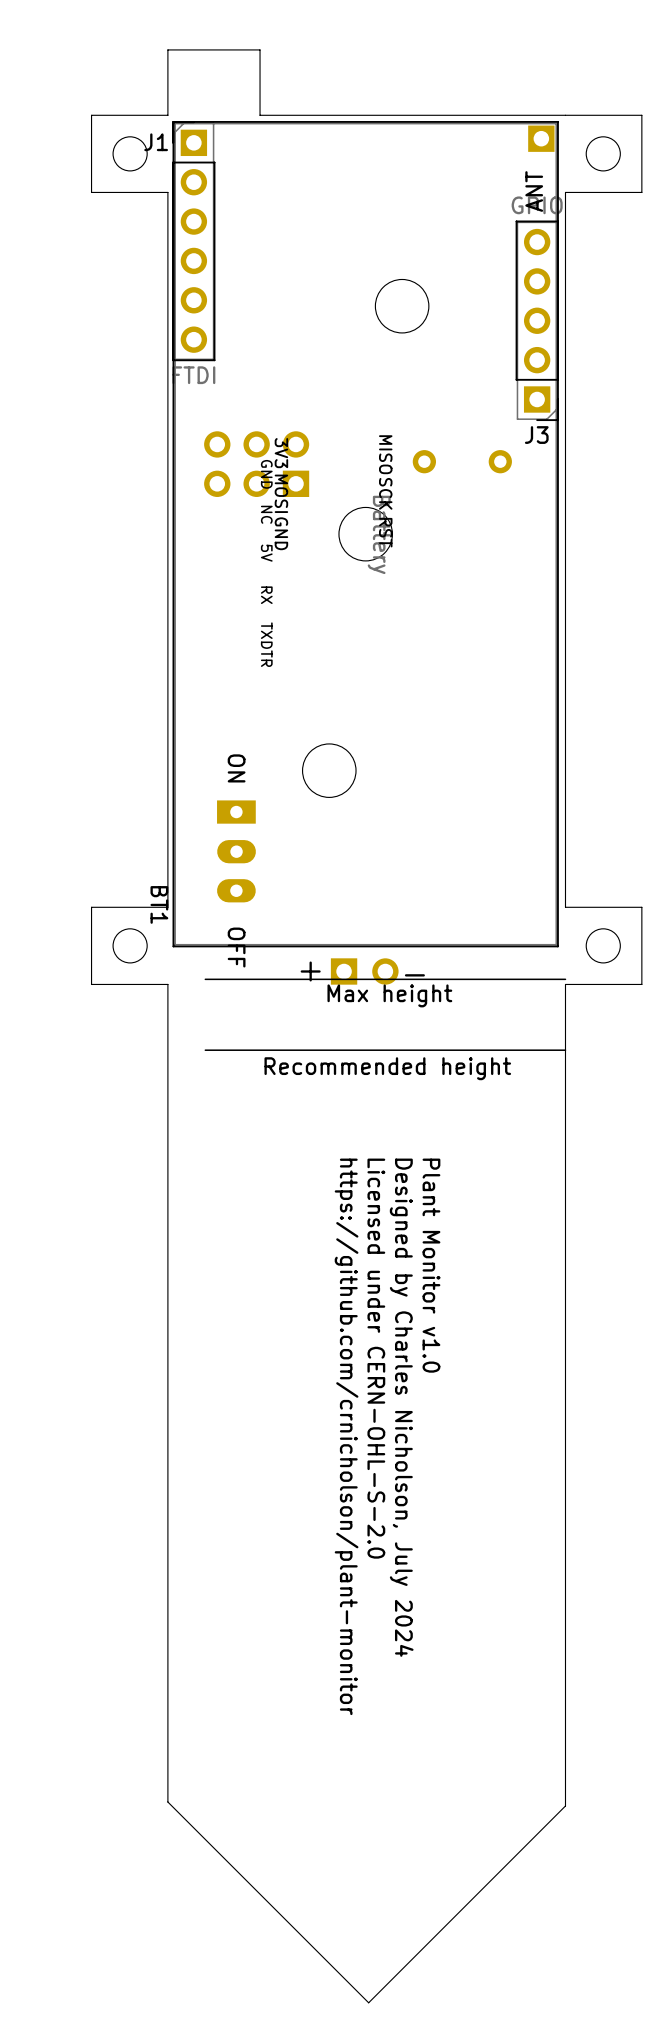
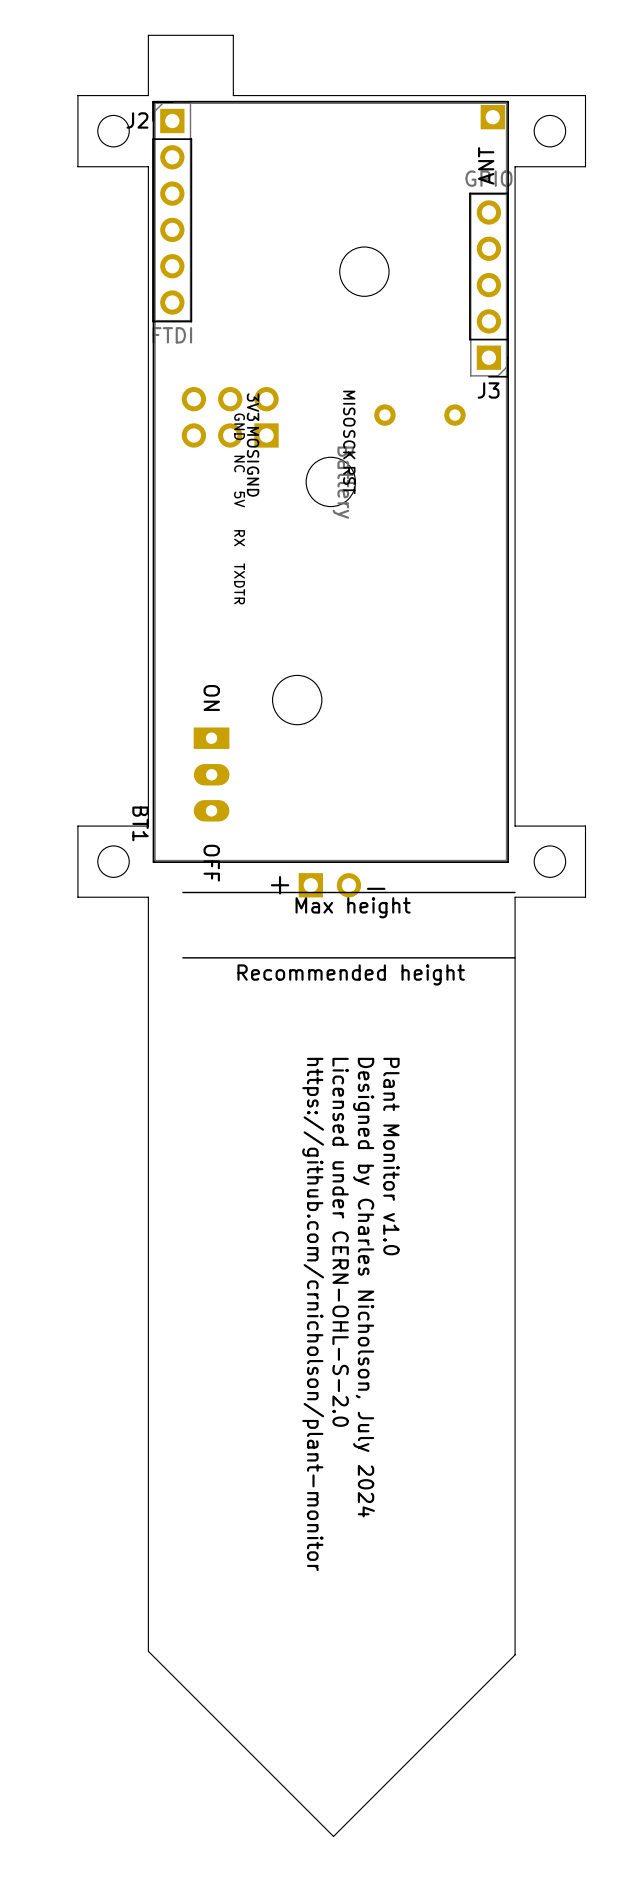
J1 name: J1 (156, 142) -> J2 (137, 120)

